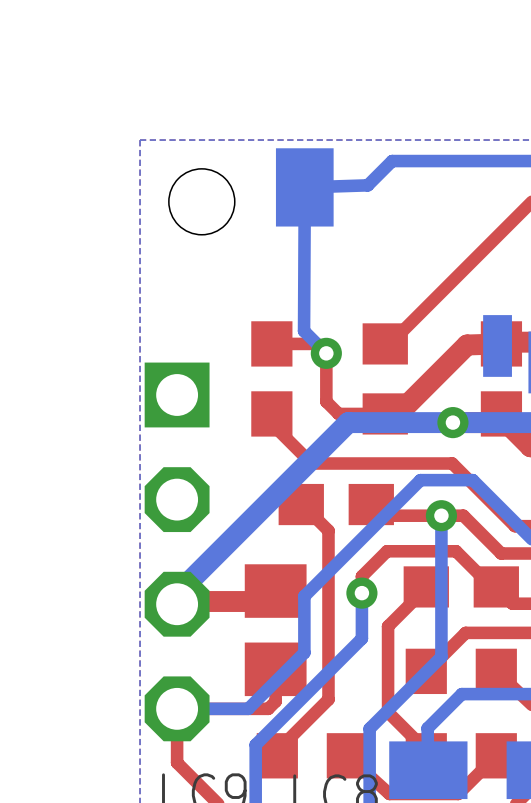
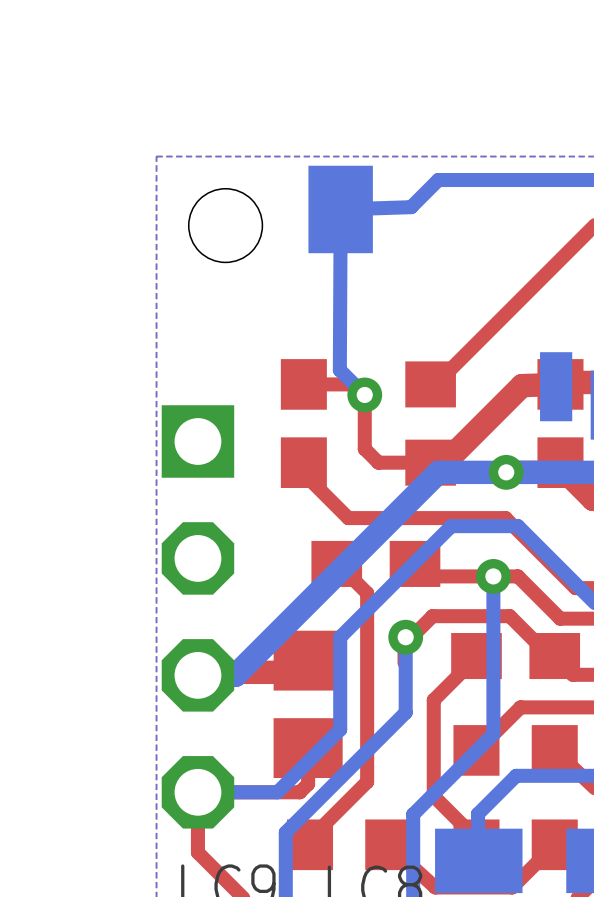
bottom track: (392, 422) (348, 422) (177, 593) (177, 604) -> (438, 472) (235, 675) (197, 675)
bottom track: (472, 480) (420, 480) (304, 596) -> (528, 536) (517, 526) (451, 526) (340, 637) (340, 666)
bottom track: (361, 593) (361, 638) -> (405, 637) (404, 713)
via position: (361, 593) -> (405, 637)

